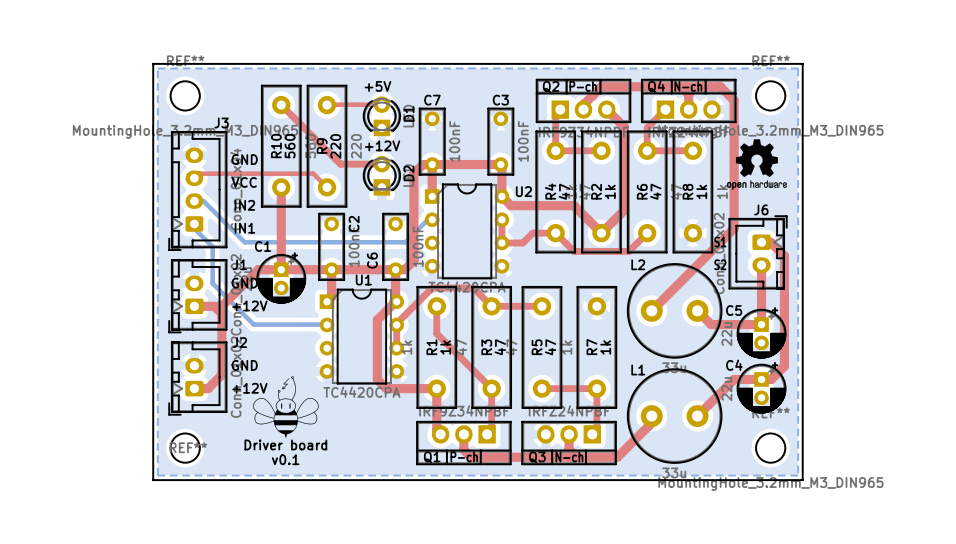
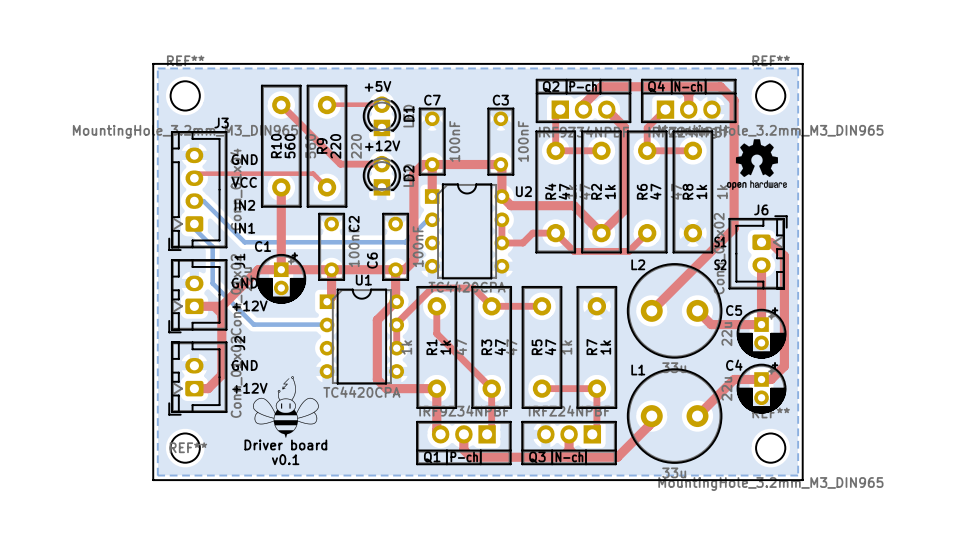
J1 name rotation: 0° (239, 264) -> 90° counterclockwise (239, 260)
J2 name rotation: 0° (239, 342) -> 90° counterclockwise (239, 343)

